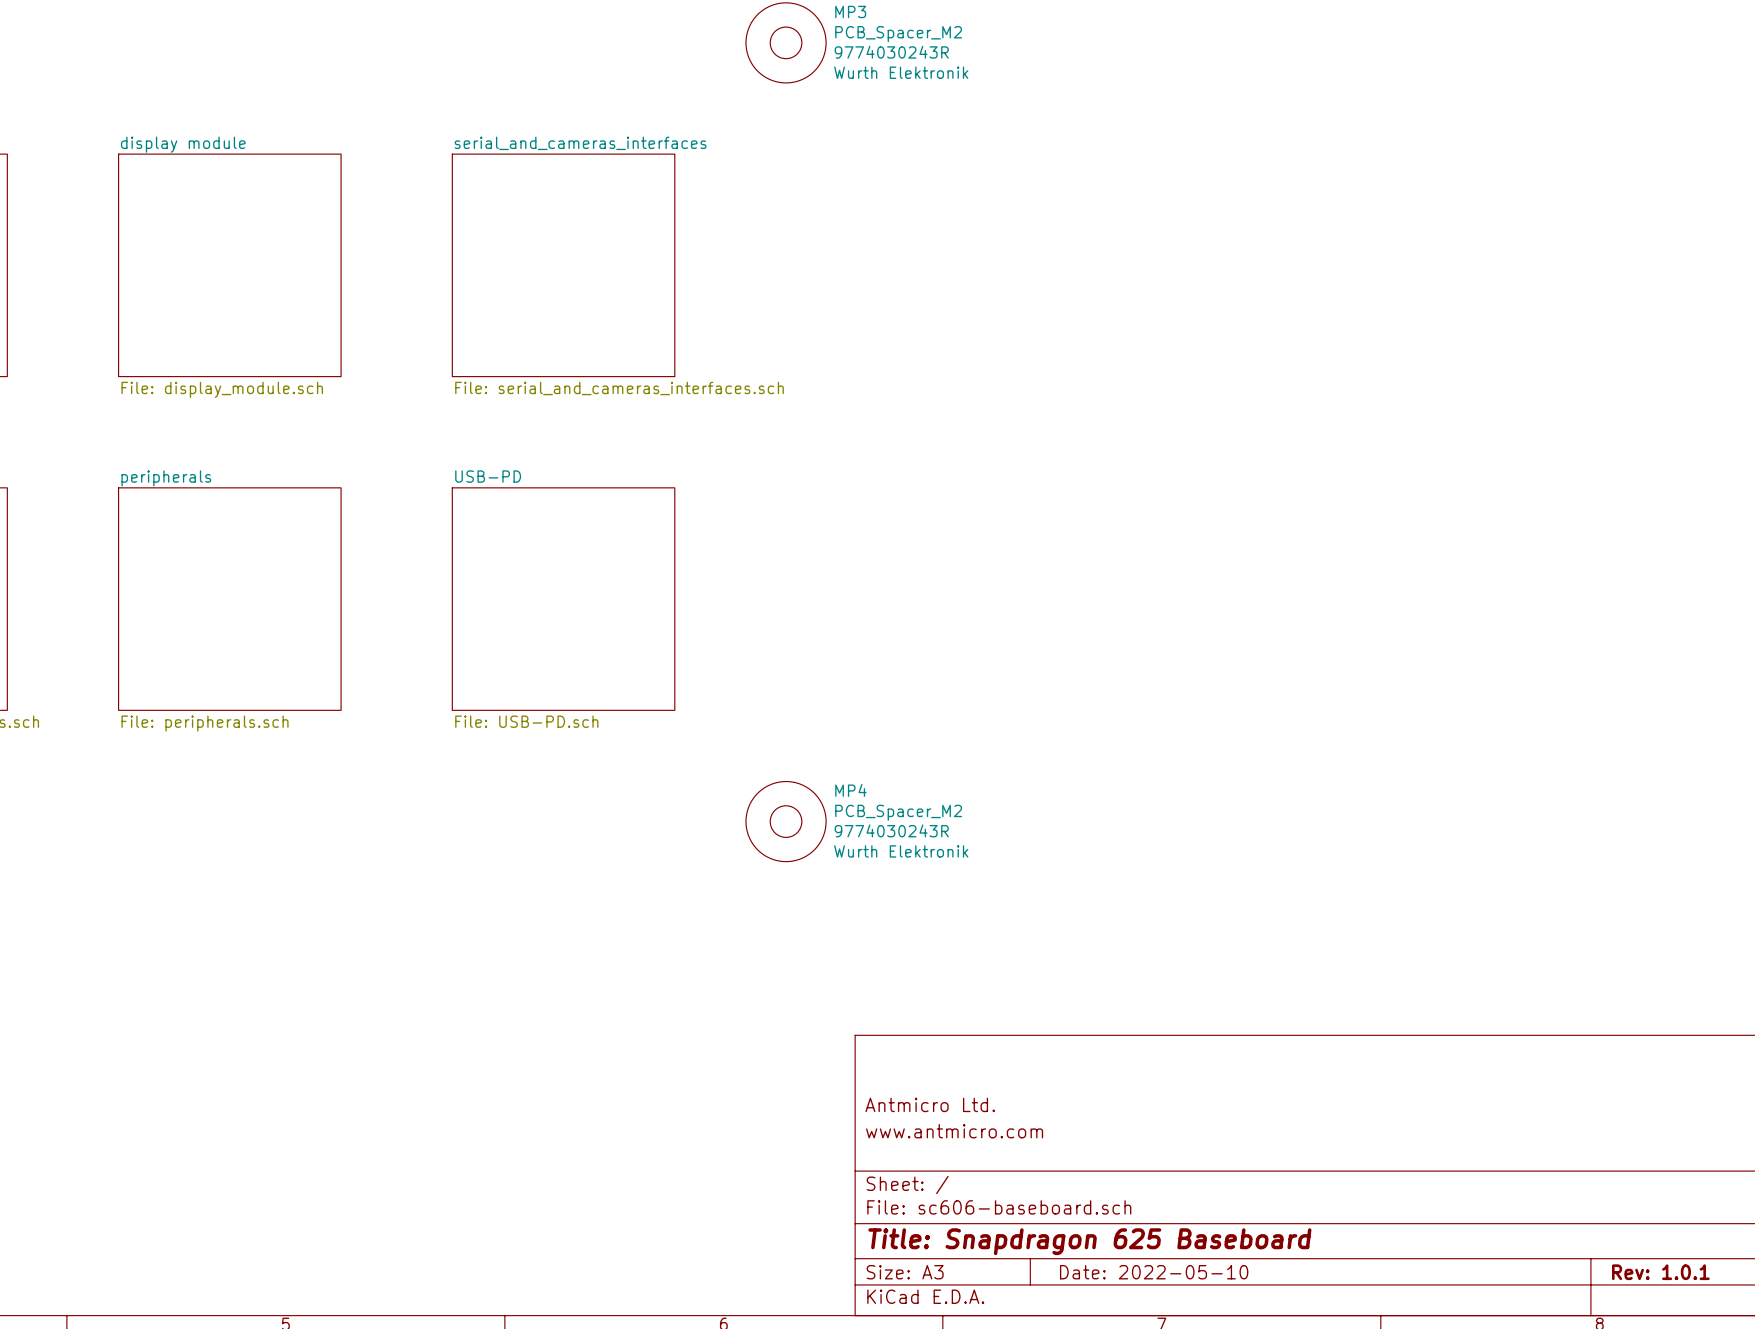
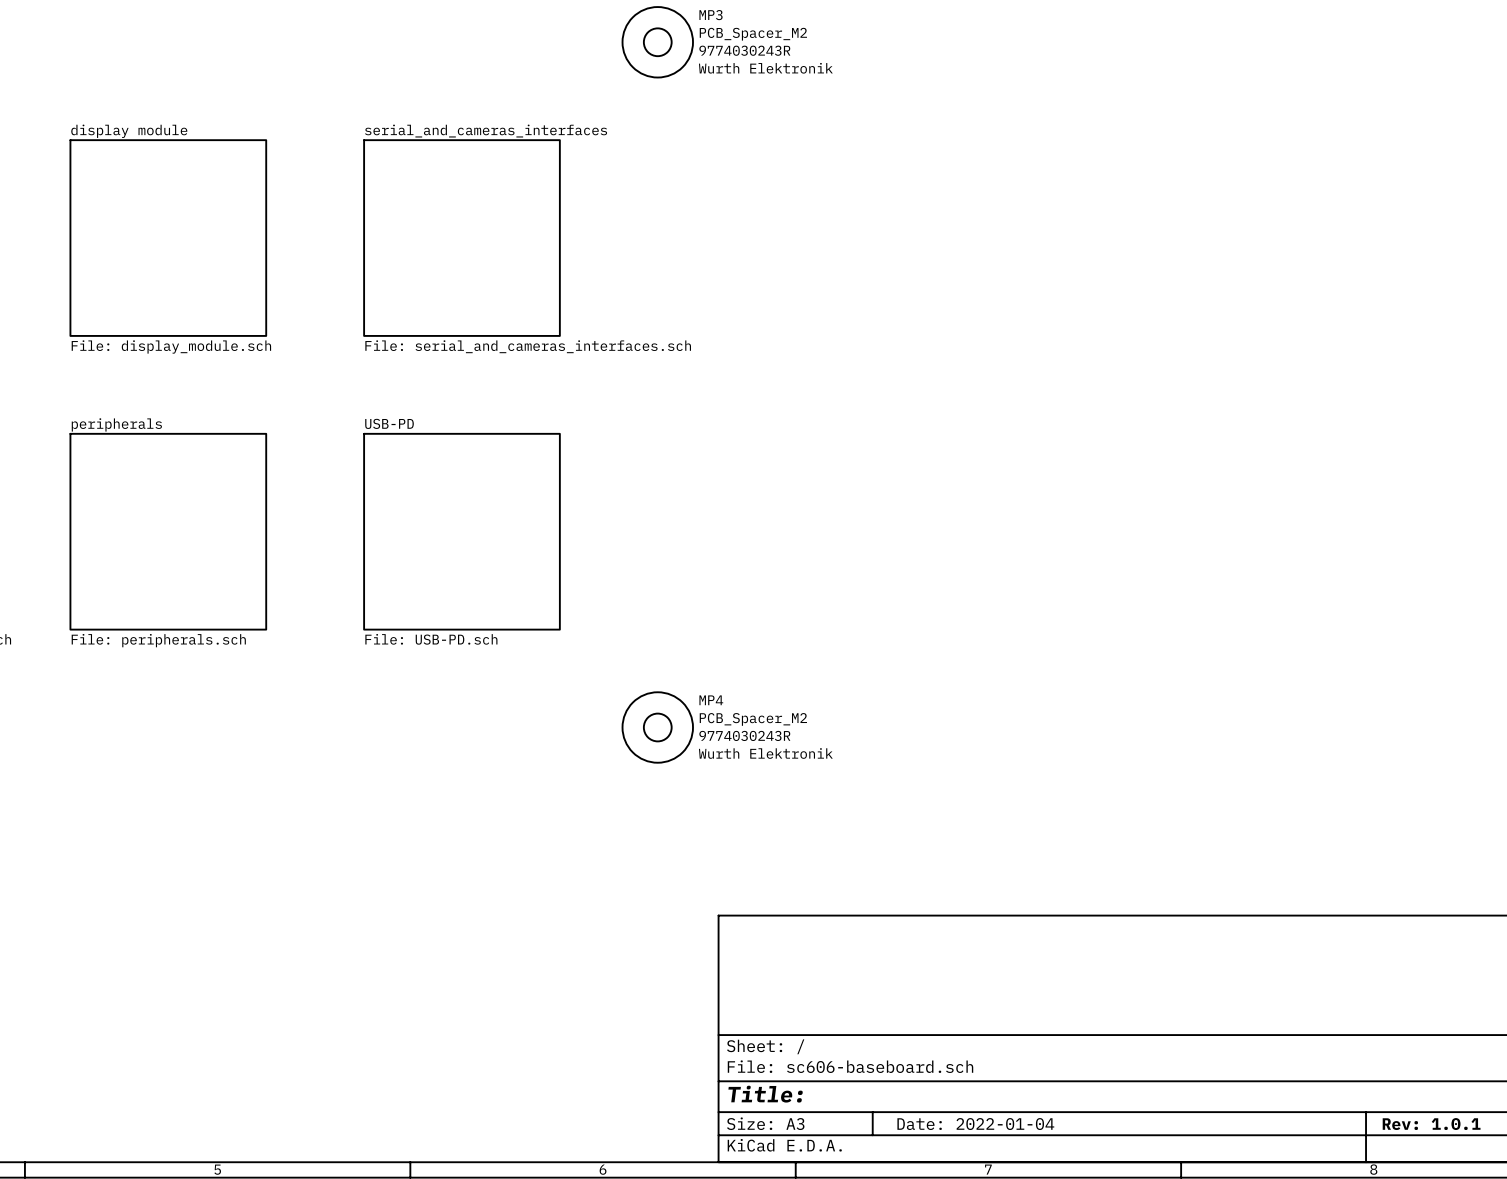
title block: Antmicro Ltd. (930, 1104) -> none
title block: www.antmicro.com (954, 1131) -> none
title block: Title: Snapdragon 625 Baseboard (1089, 1241) -> Title: (765, 1094)
title block: Date: 2022-05-10 (1154, 1272) -> Date: 2022-01-04 (975, 1124)

